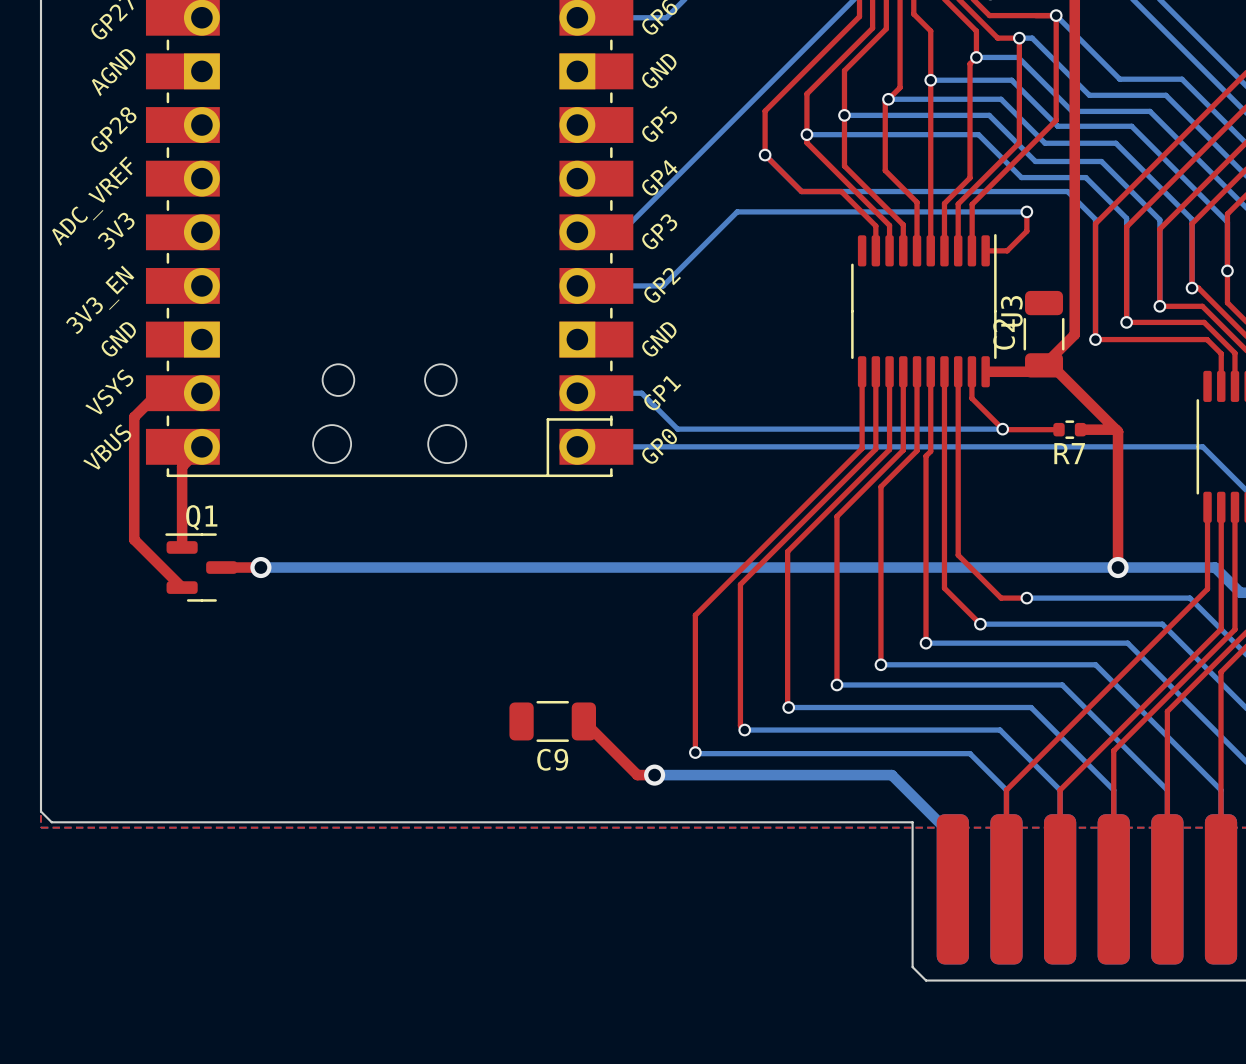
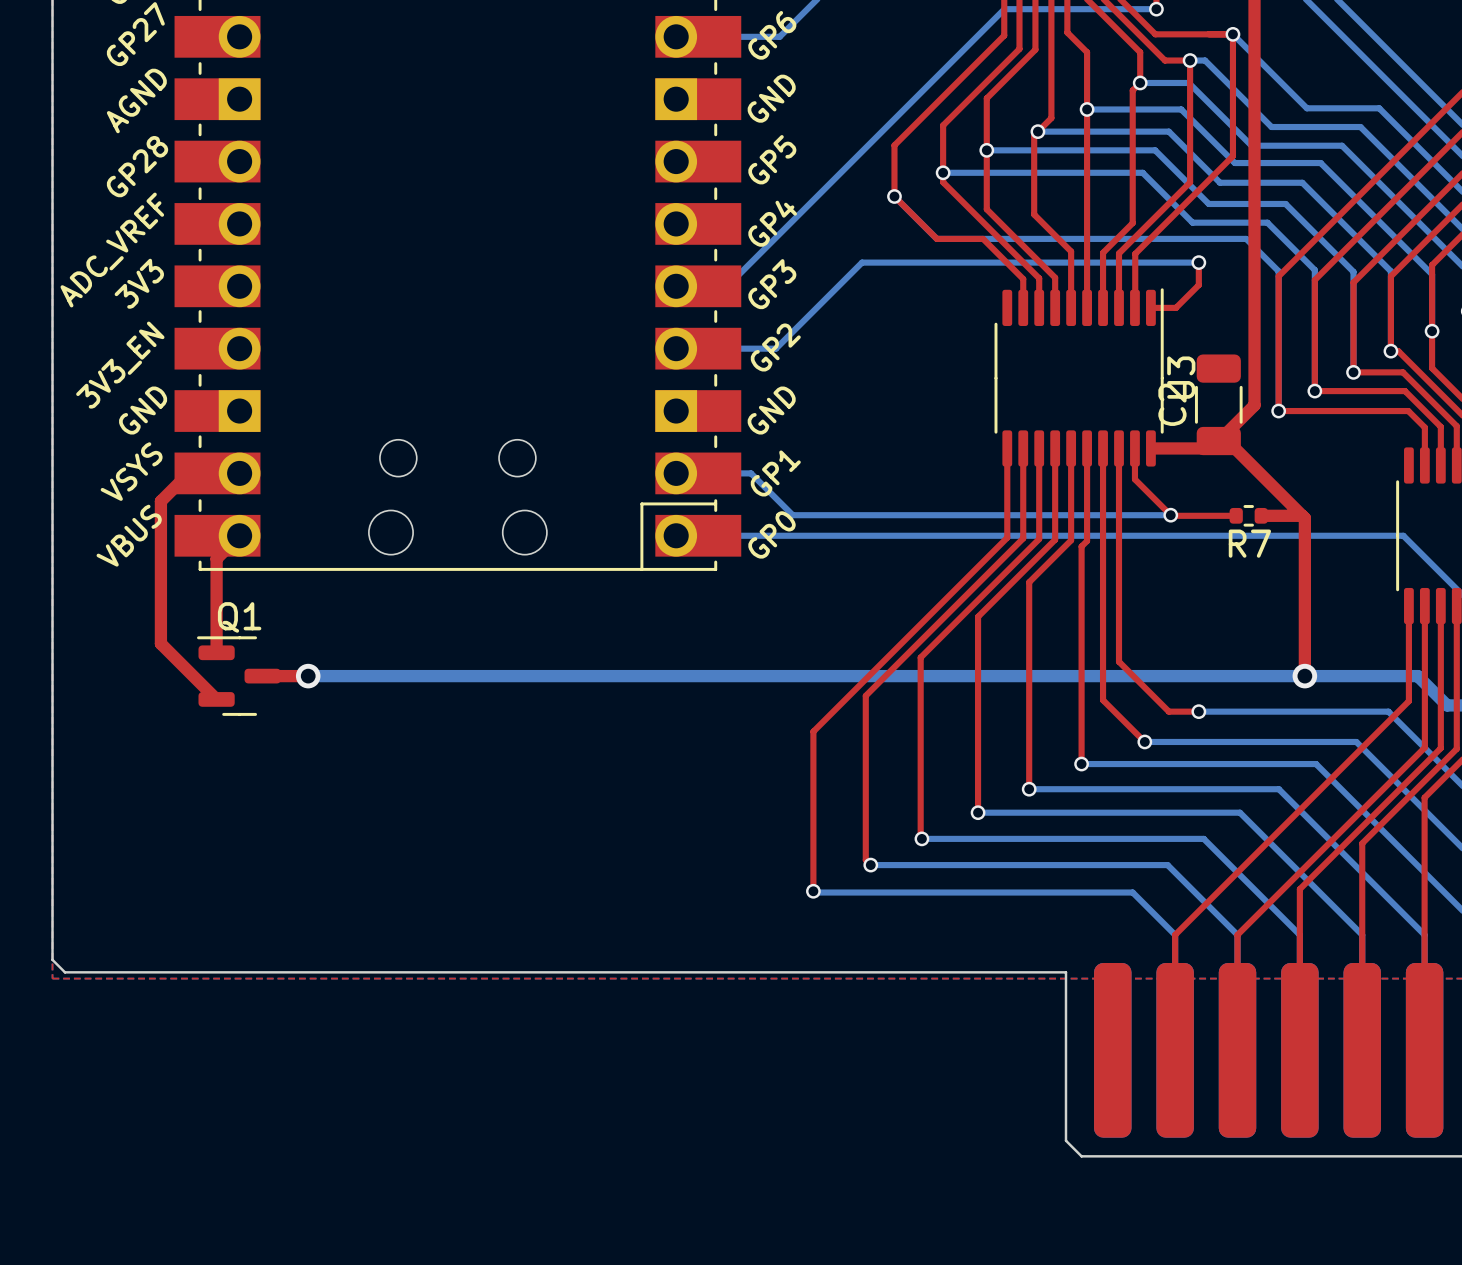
C9: (552, 721) -> none
top track: (583, 721) (637, 775) (654, 775) -> none
bottom track: (653, 775) (891, 775) (952, 836) (952, 889) -> none
via: (654, 775) -> none

